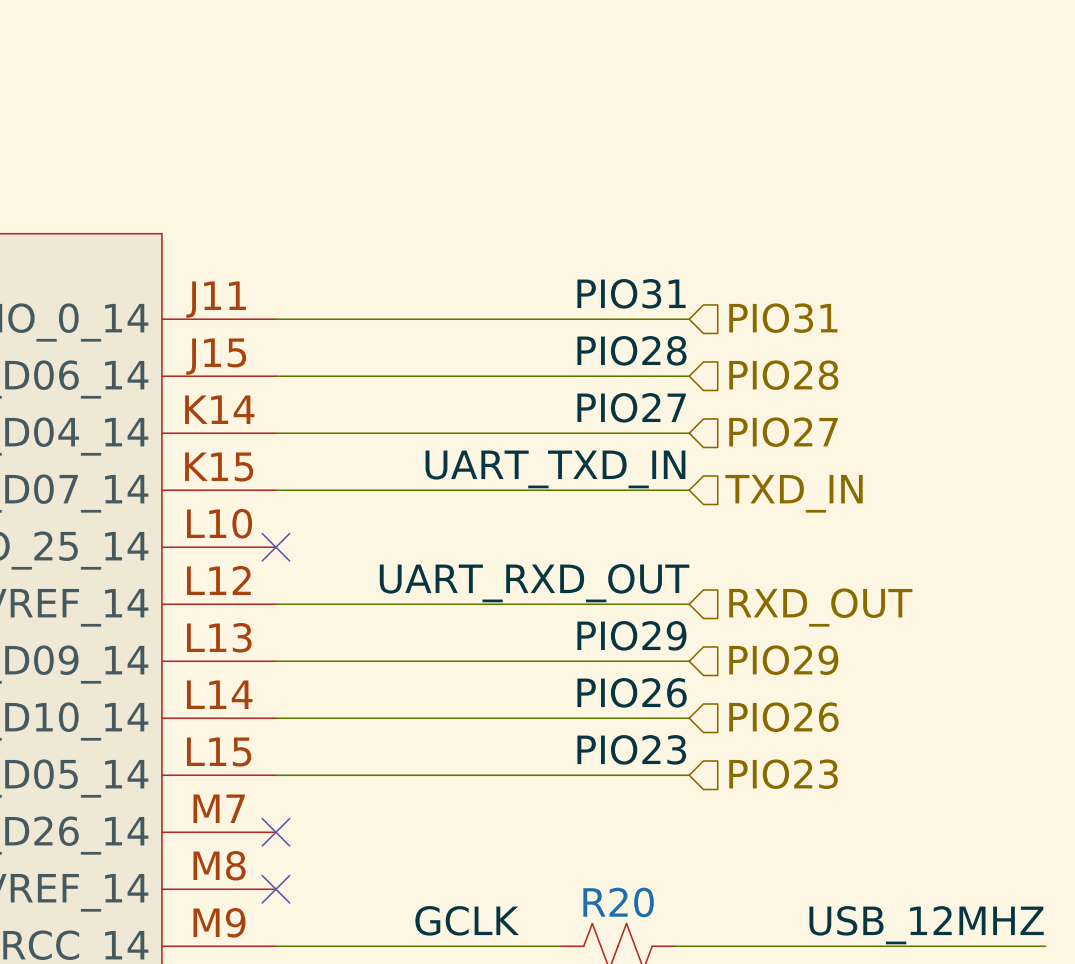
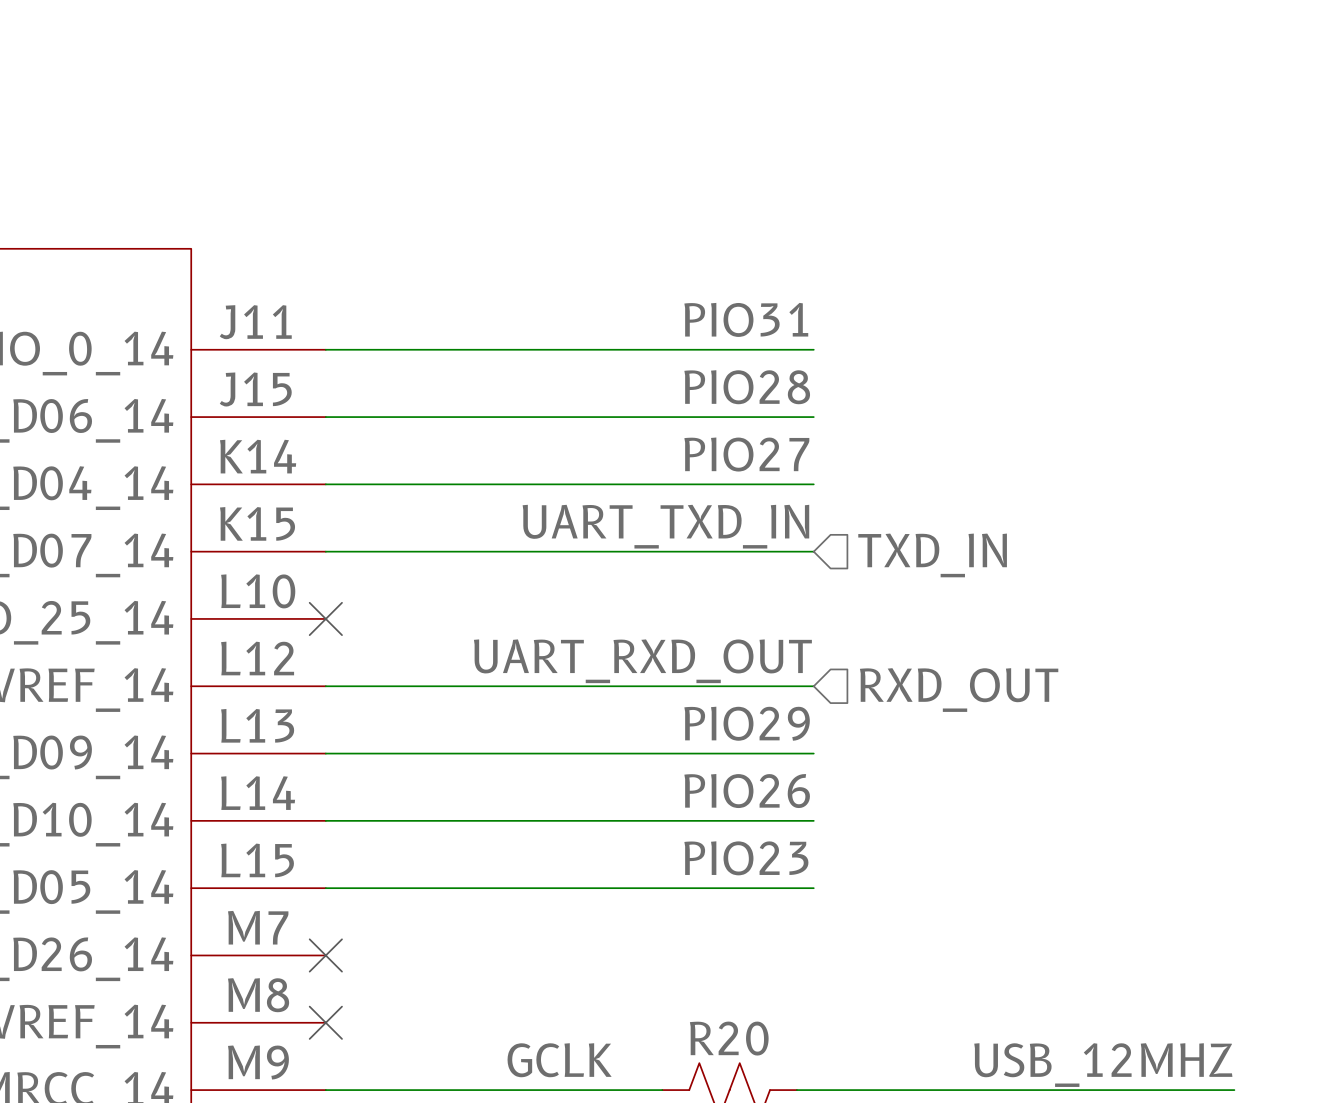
hierarchical label: PIO31 (783, 318) -> none
hierarchical label: PIO28 (783, 375) -> none
hierarchical label: PIO27 (783, 432) -> none
hierarchical label: PIO29 (783, 660) -> none
hierarchical label: PIO26 (783, 717) -> none
hierarchical label: PIO23 (783, 774) -> none

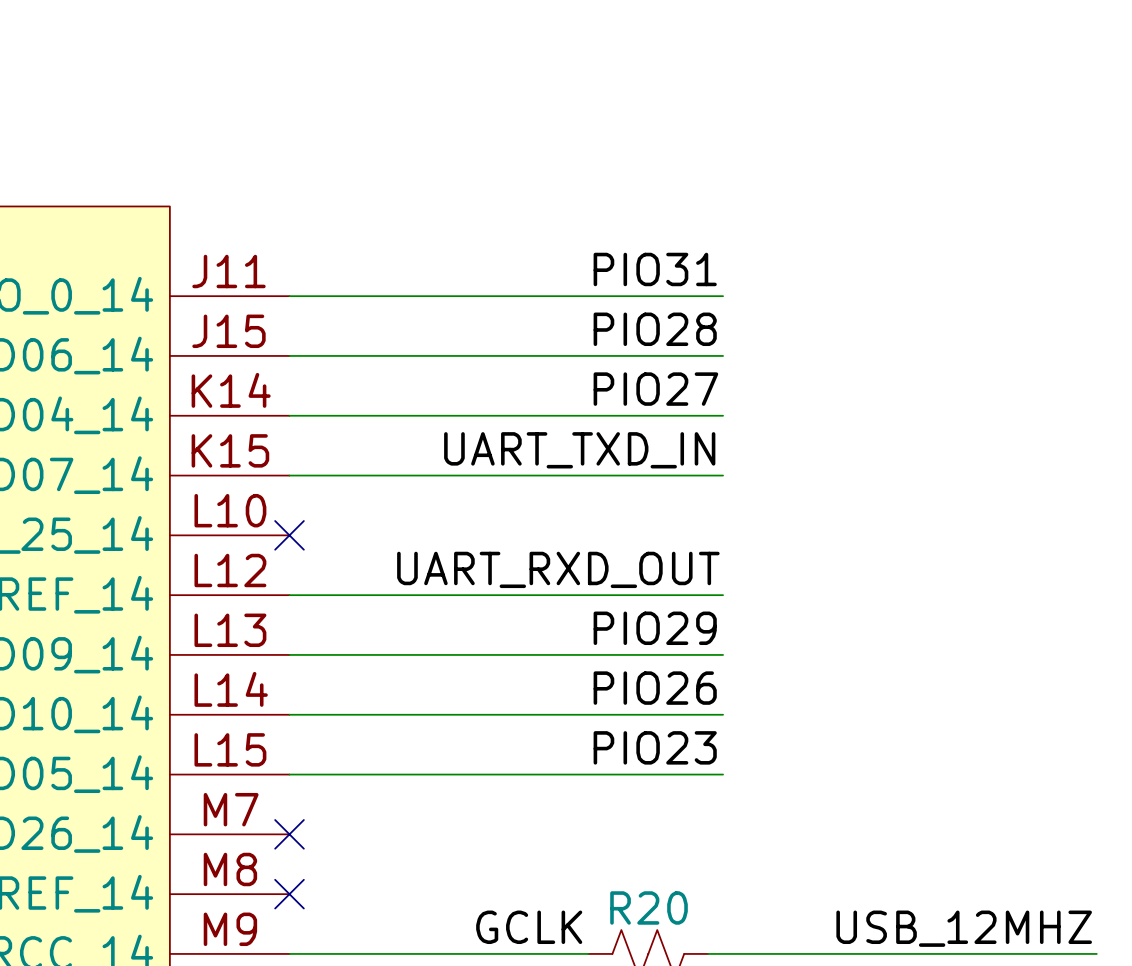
hierarchical label: TXD_IN (932, 555) -> none
hierarchical label: RXD_OUT (959, 690) -> none
label position: GCLK (559, 1060) -> GCLK (529, 927)

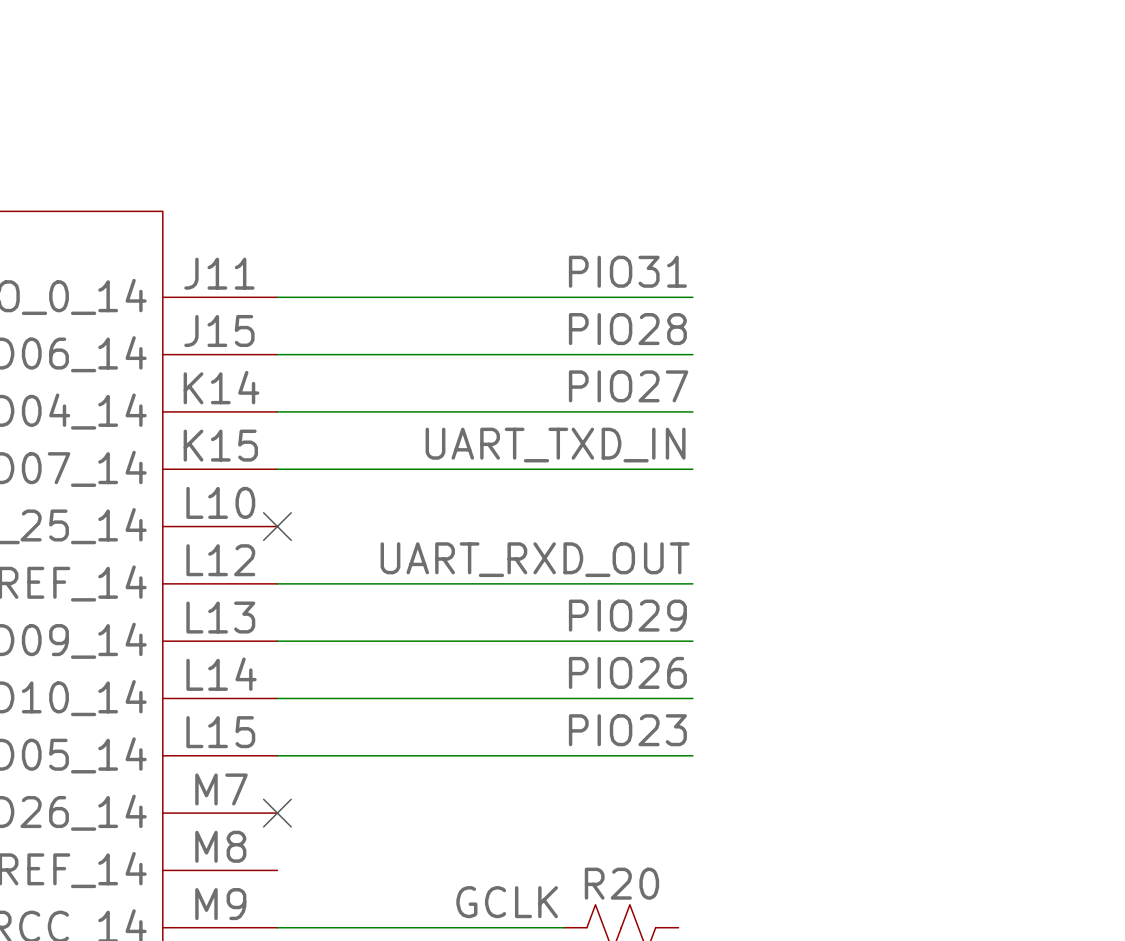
no-connect mark: (289, 894) -> none
label: USB_12MHZ (964, 928) -> none
wire: (708, 953) (1096, 953) -> none

